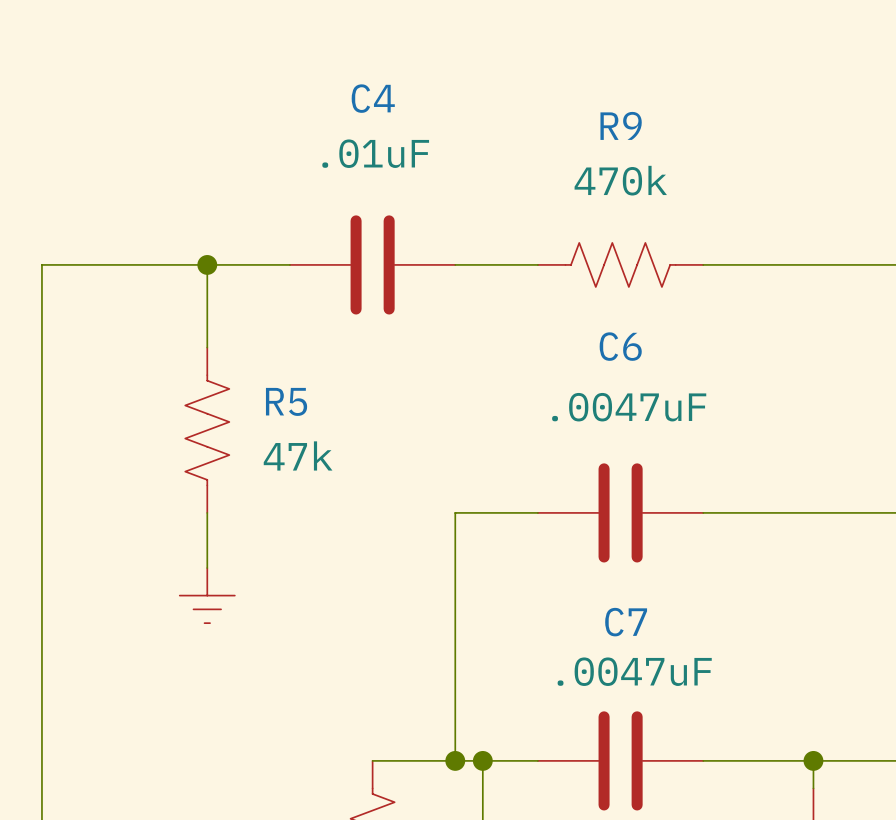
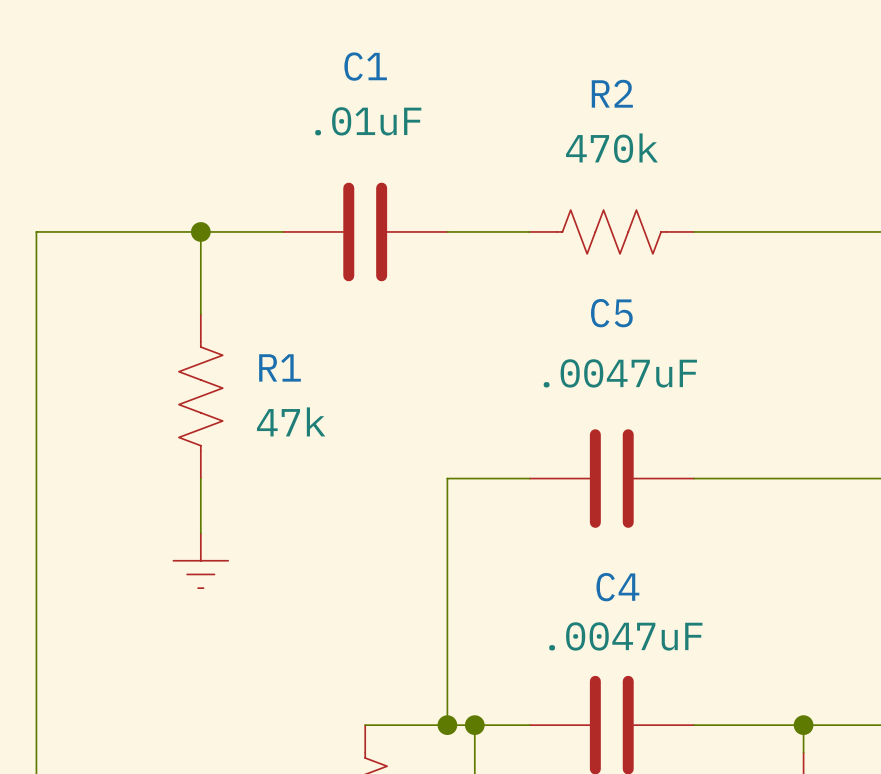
C4 name: C4 (373, 98) -> C1 (365, 66)
R9 name: R9 (621, 125) -> R2 (612, 93)
C6 name: C6 (620, 346) -> C5 (611, 313)
R5 name: R5 (286, 401) -> R1 (280, 367)
C7 name: C7 (626, 622) -> C4 (617, 587)

